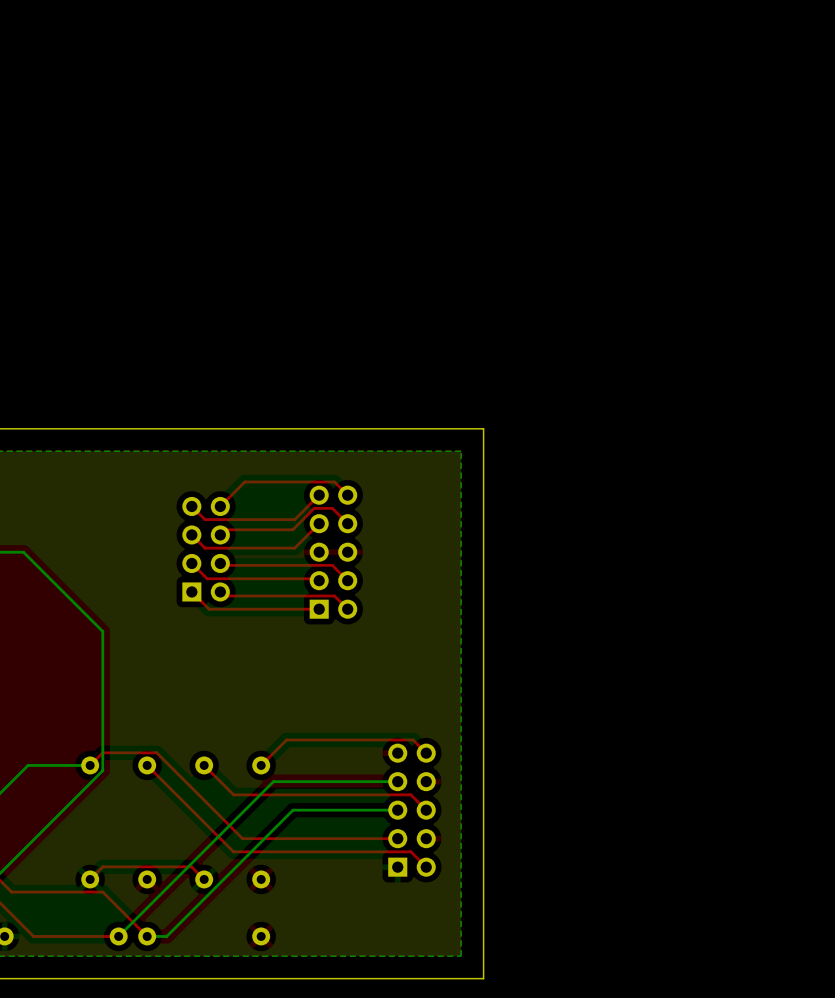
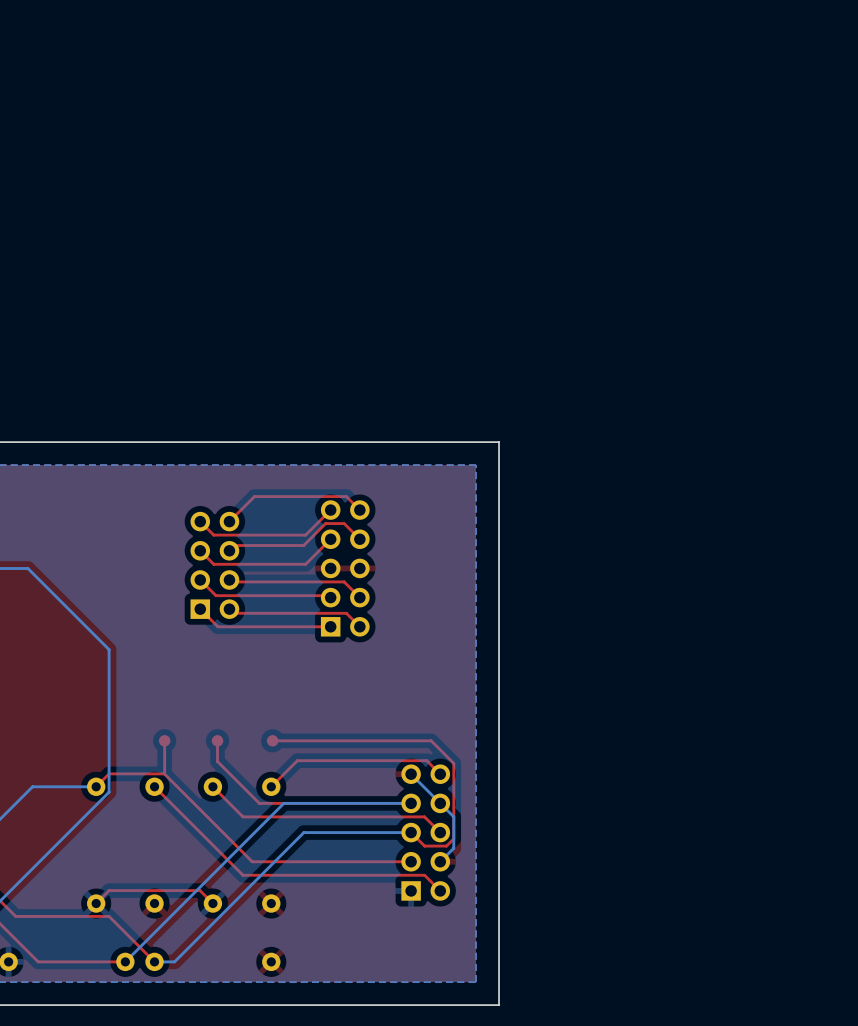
top track: none -> (164, 740) (164, 773)
part: none -> (164, 740)
top track: none -> (217, 740) (217, 761) (259, 803) (411, 803)
part: none -> (217, 740)
top track: none -> (272, 740) (431, 740) (453, 763) (453, 838) (446, 846) (424, 846) (411, 832)
part: none -> (272, 740)
bottom track: none -> (411, 774) (453, 816) (453, 848) (440, 861)

